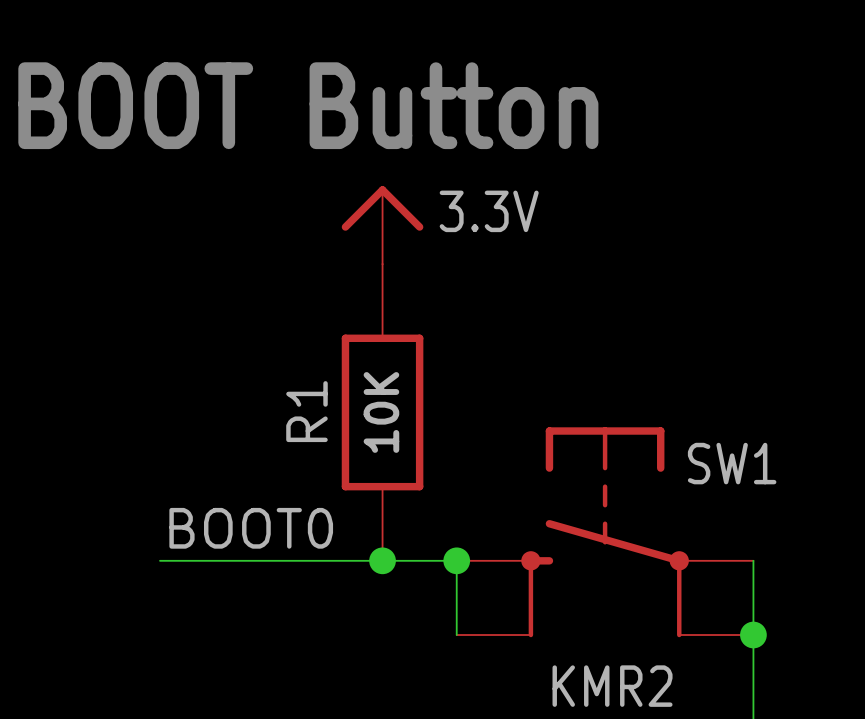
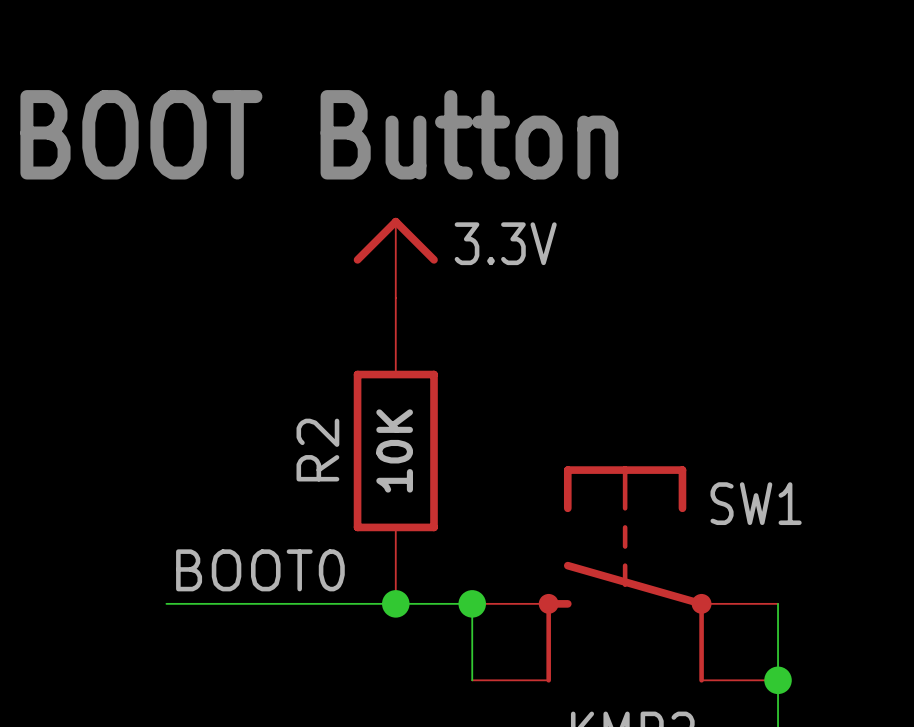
R1 name: R1 (306, 411) -> R2 (317, 450)

